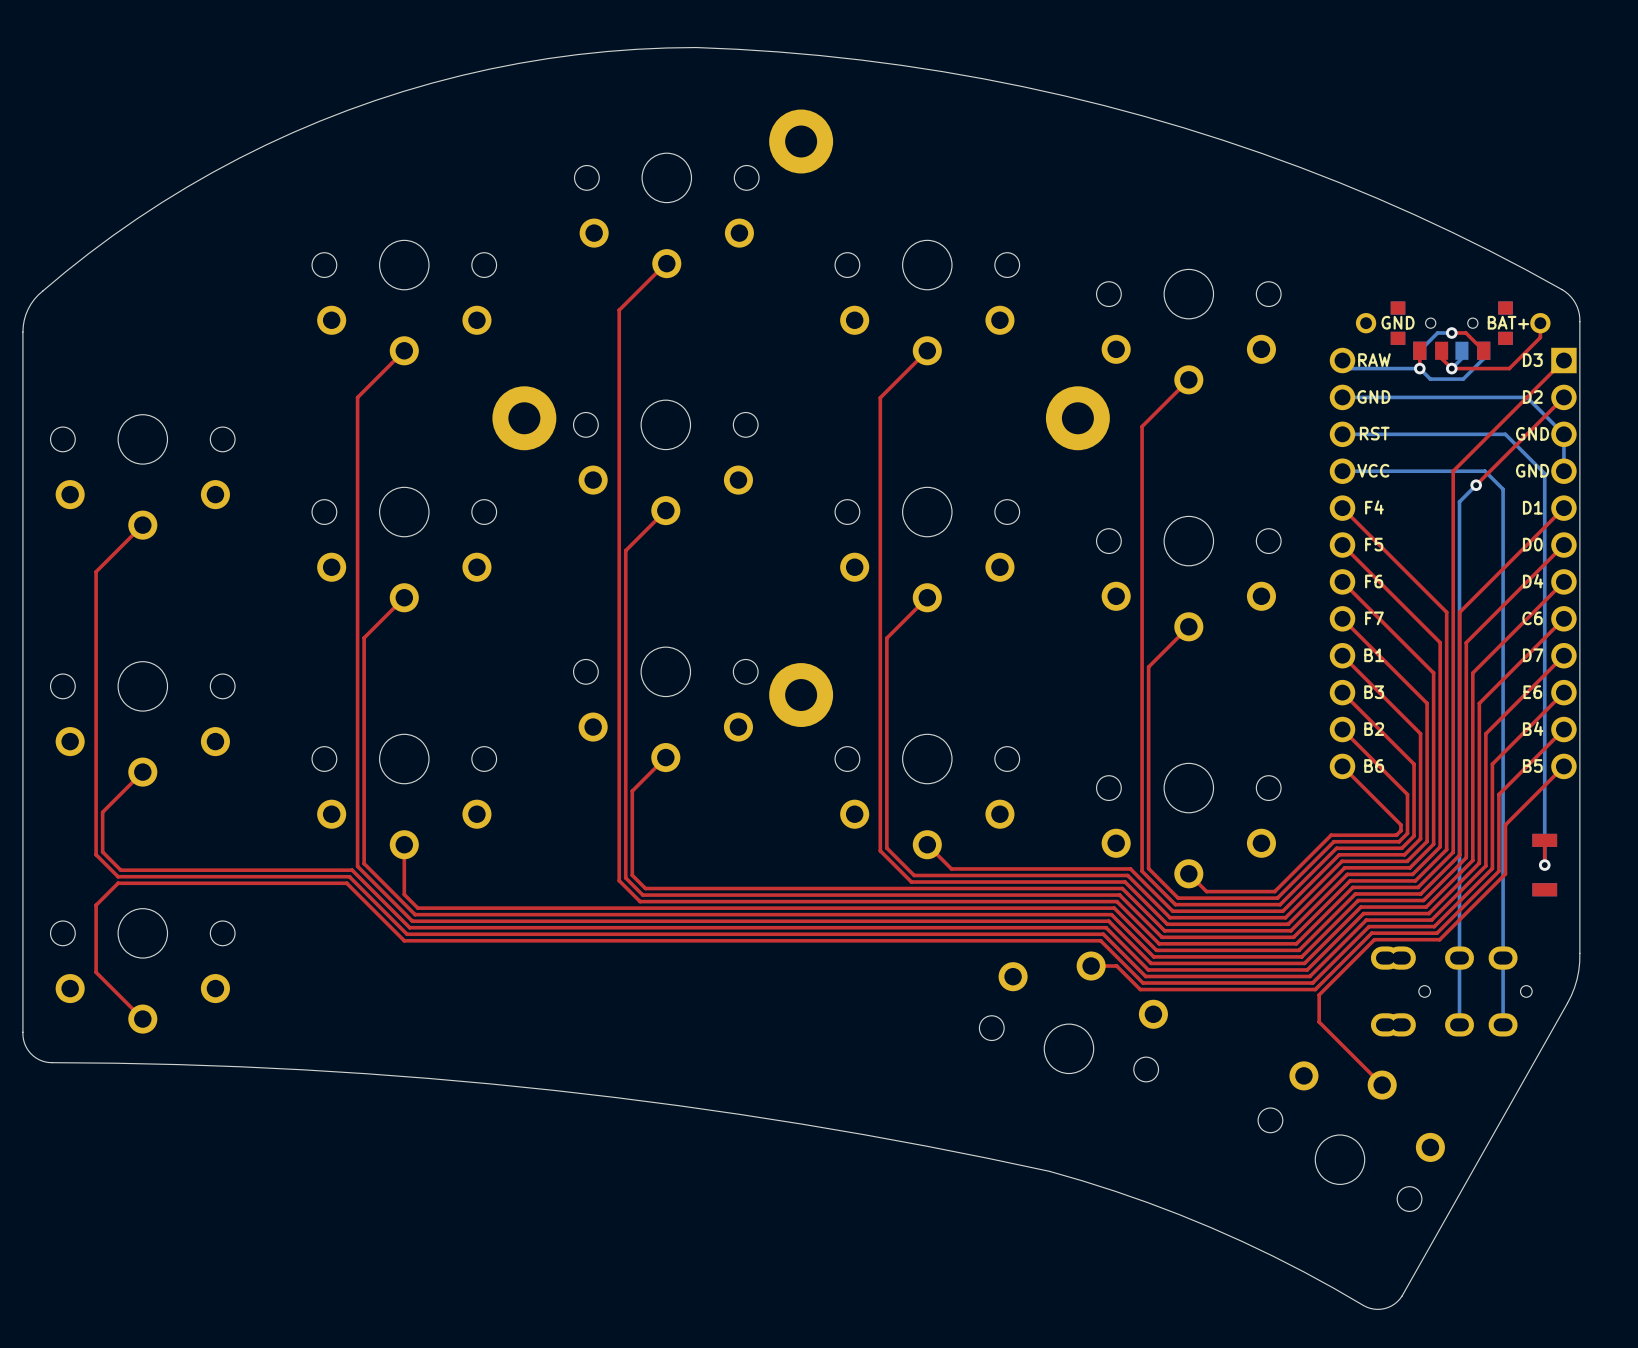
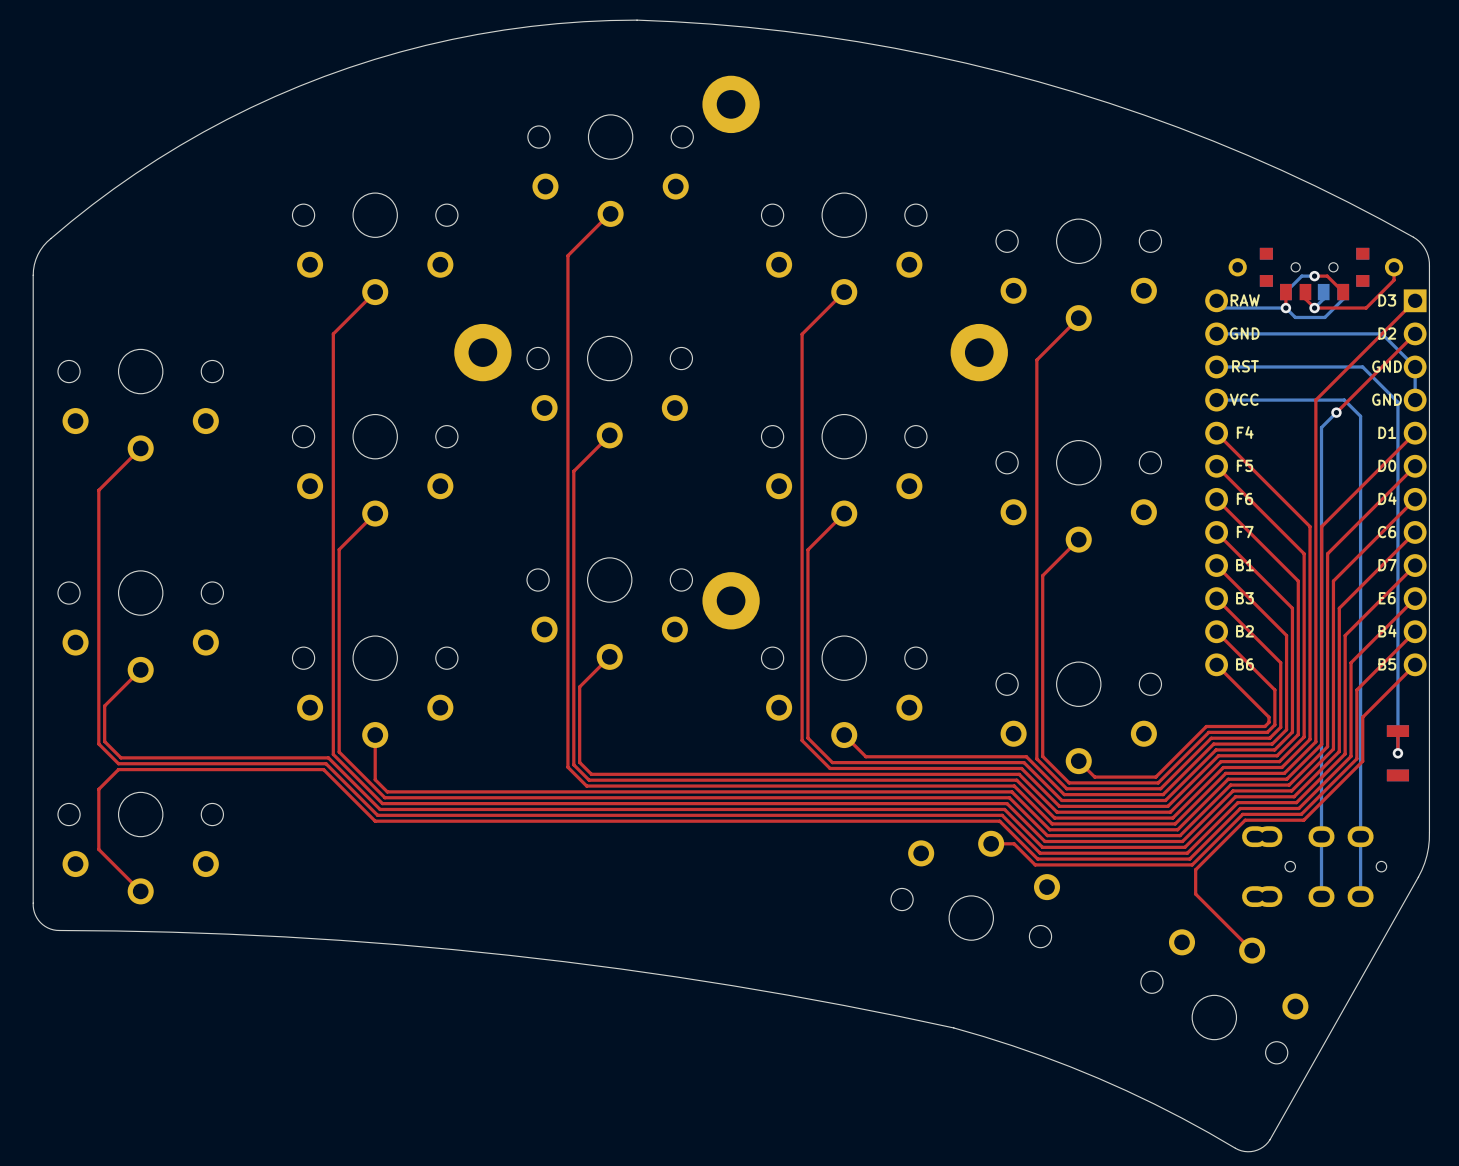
text: GND (1398, 322) -> none
text: BAT+ (1508, 322) -> none

